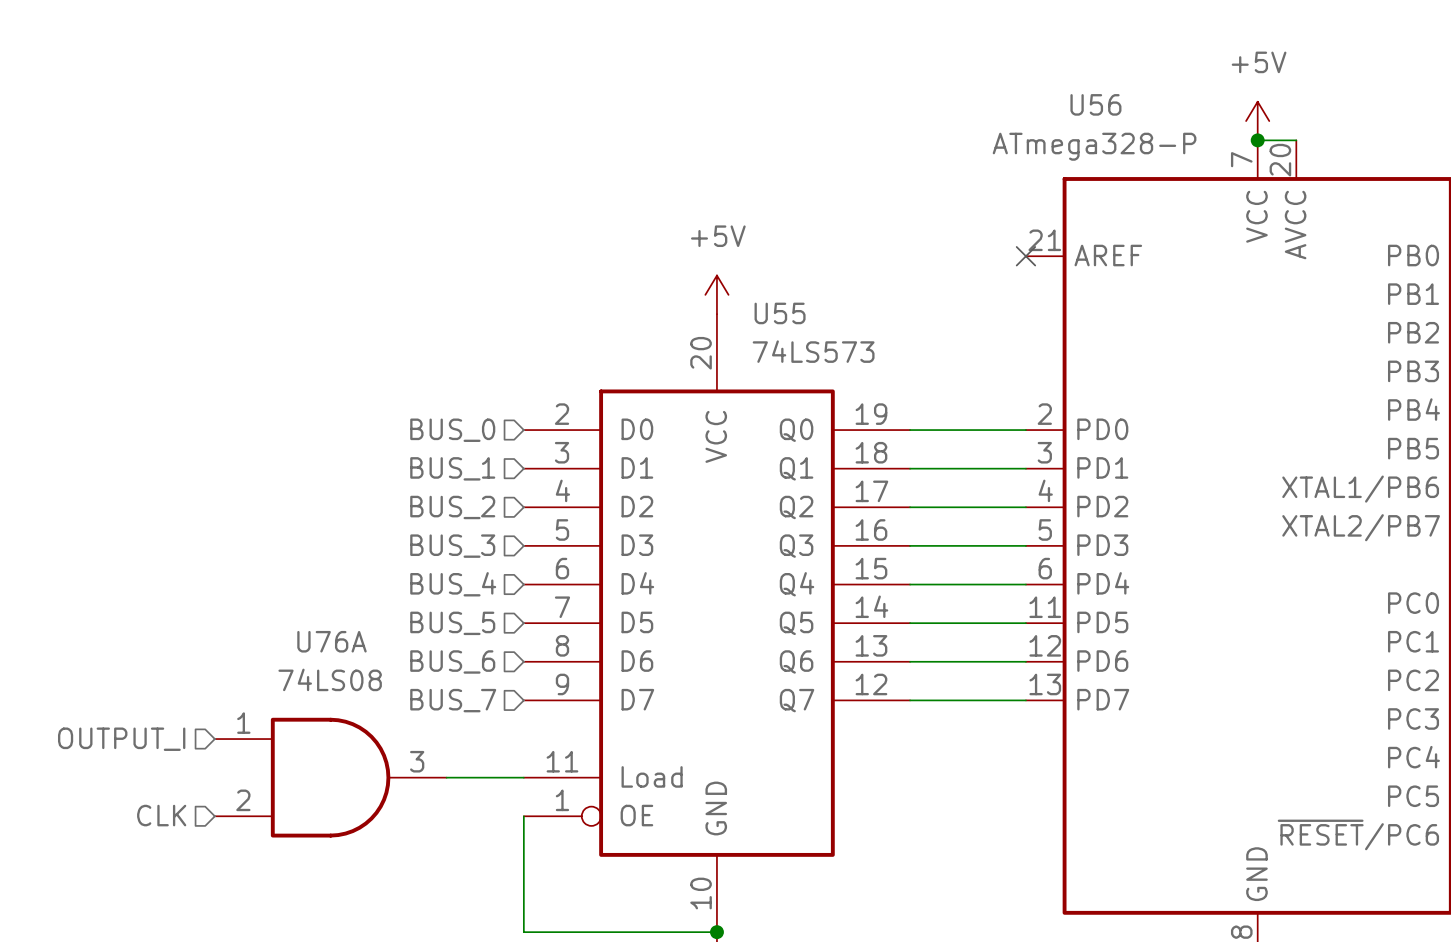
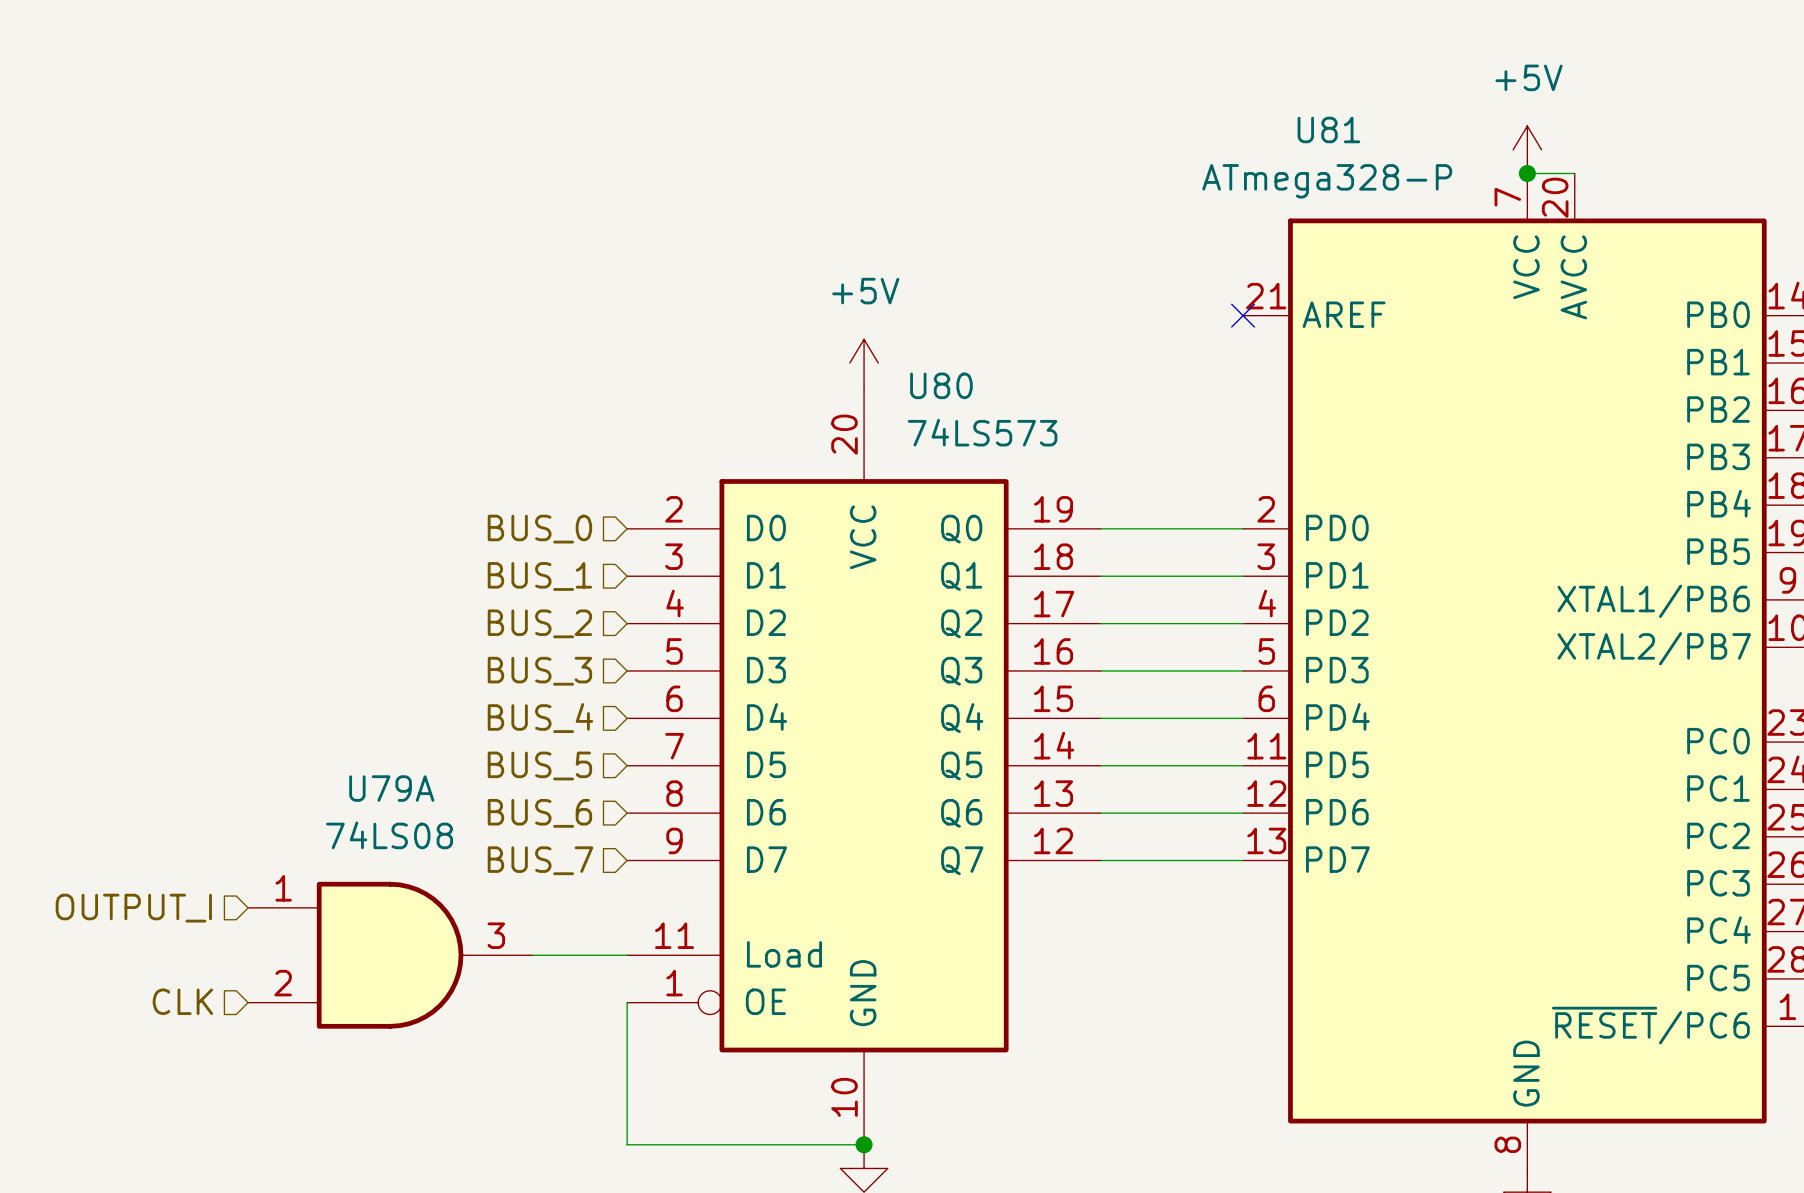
U56 name: U56 (1095, 104) -> U81 (1328, 129)
U55 name: U55 (780, 313) -> U80 (941, 385)
U76A name: U76A (331, 641) -> U79A (391, 788)

